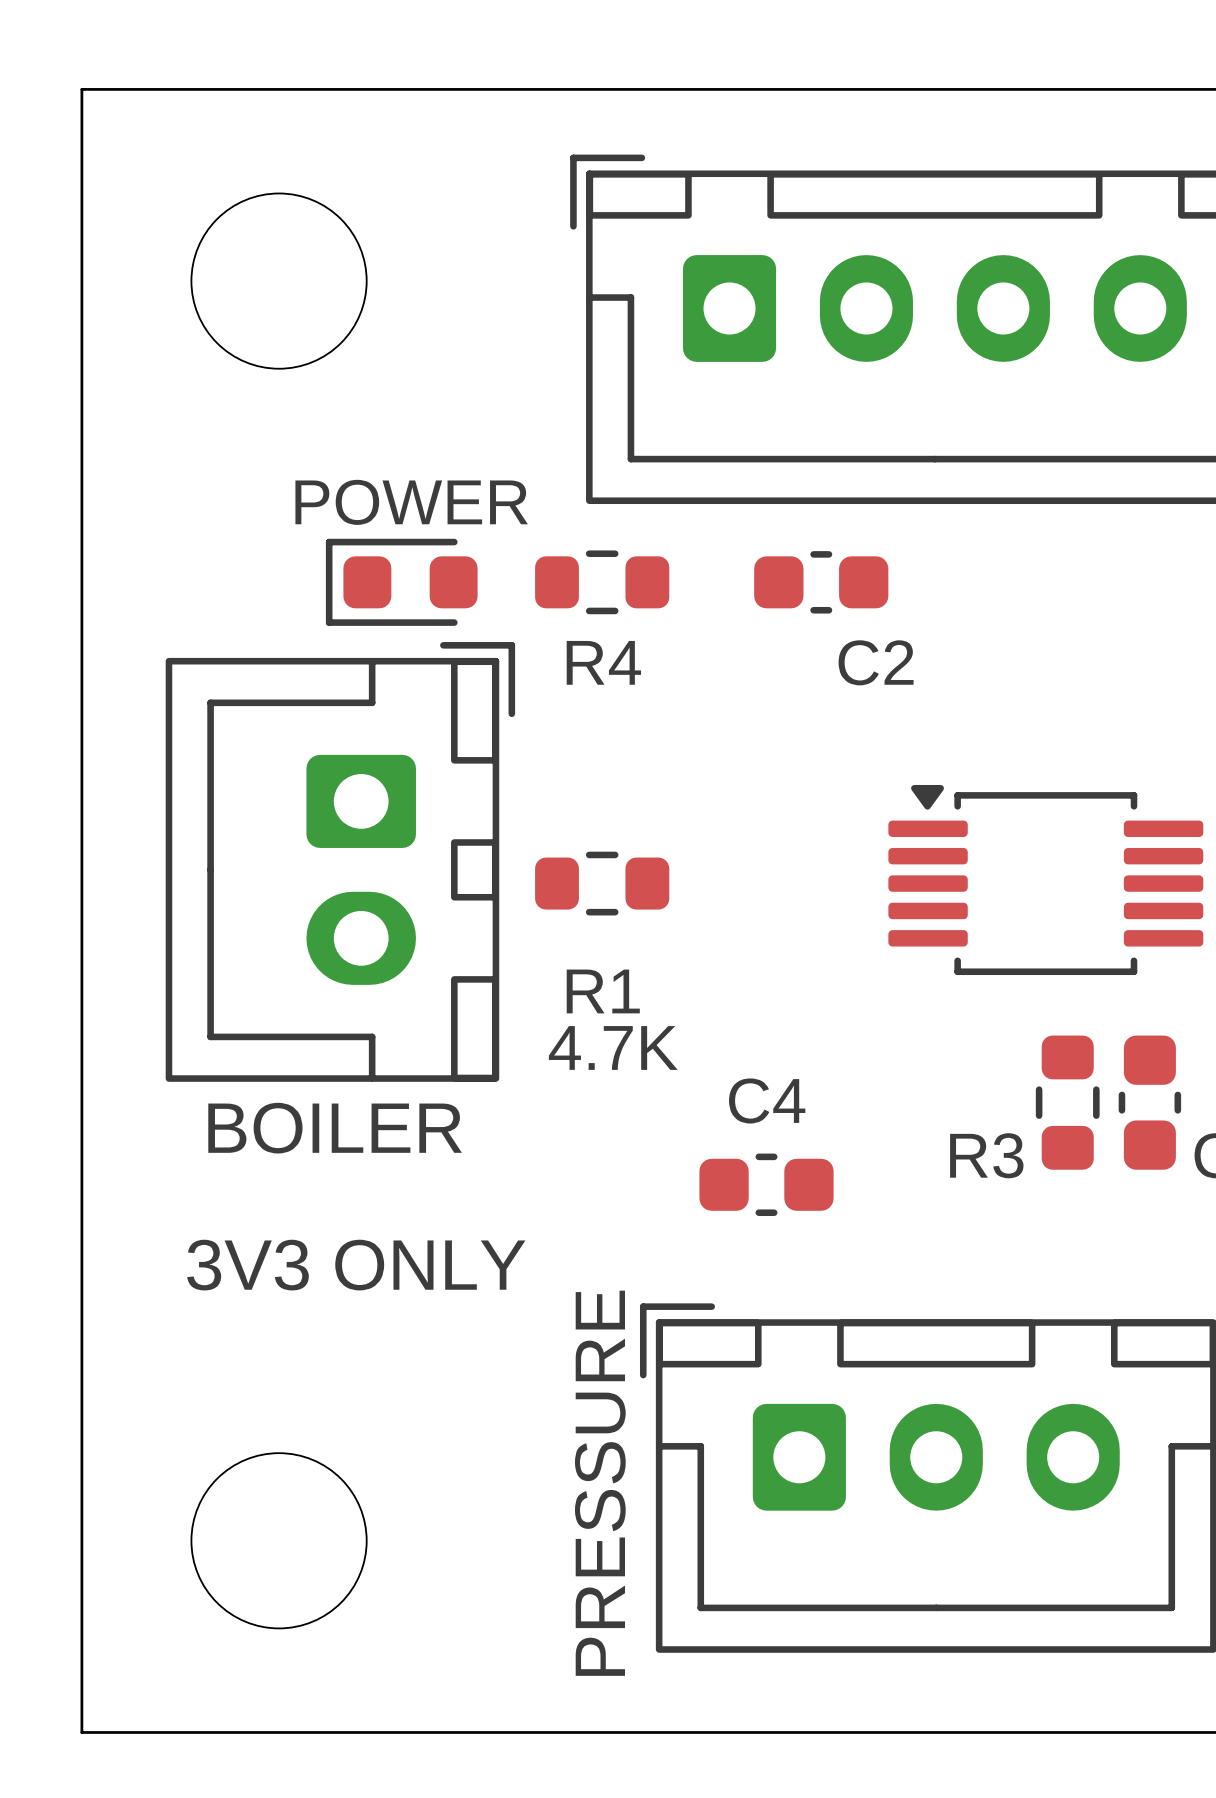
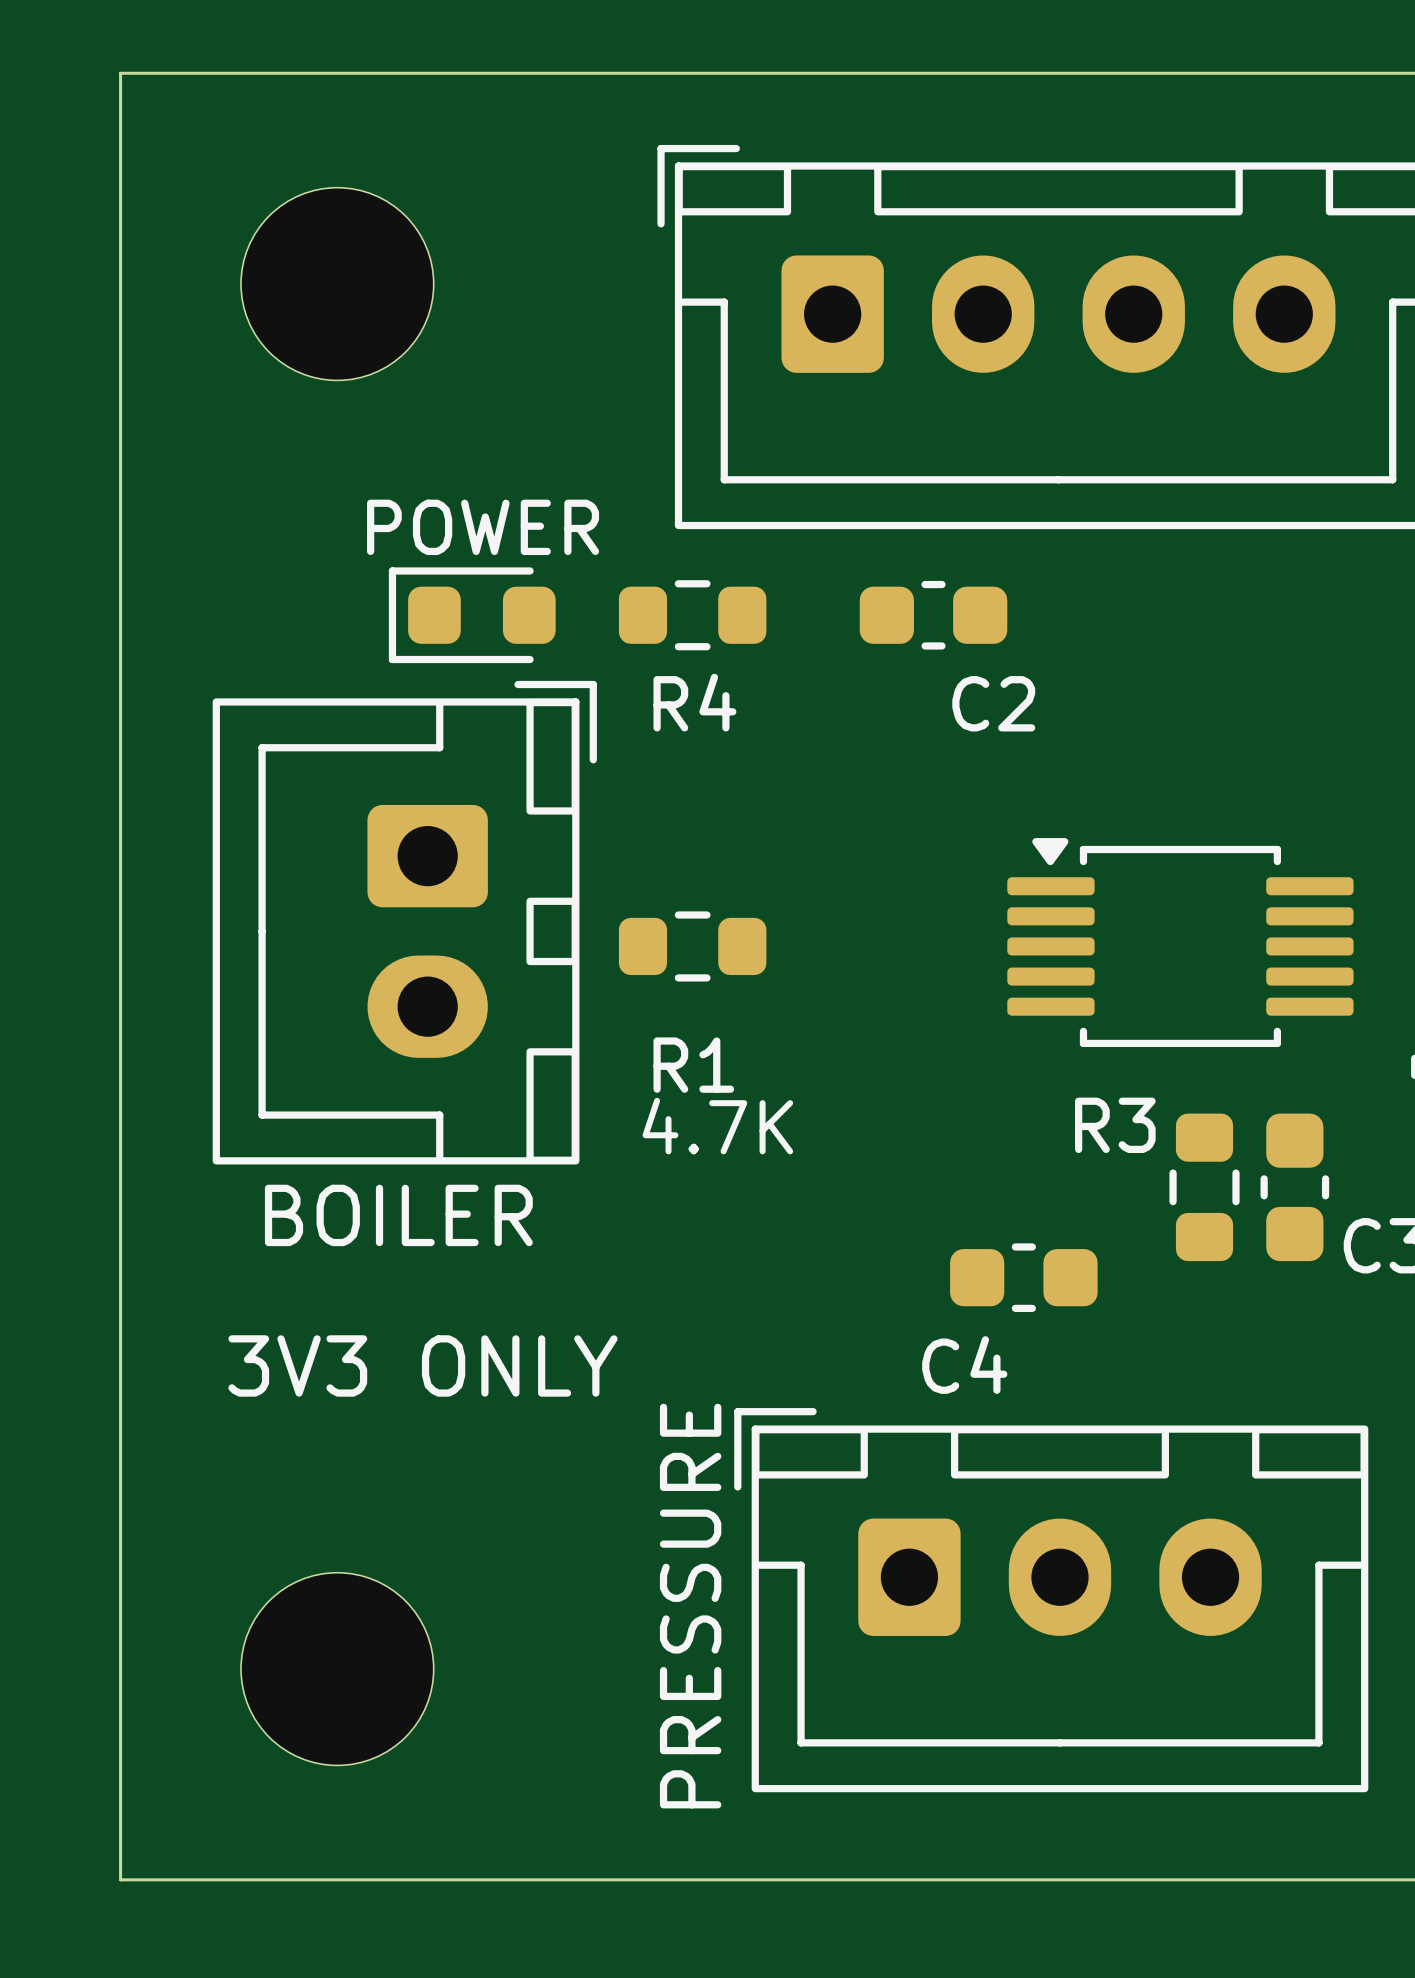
C4 name position: C4 (767, 1100) -> C4 (964, 1365)
R3 name position: R3 (986, 1155) -> R3 (1115, 1125)
C4 position: (766, 1184) -> (1023, 1277)

